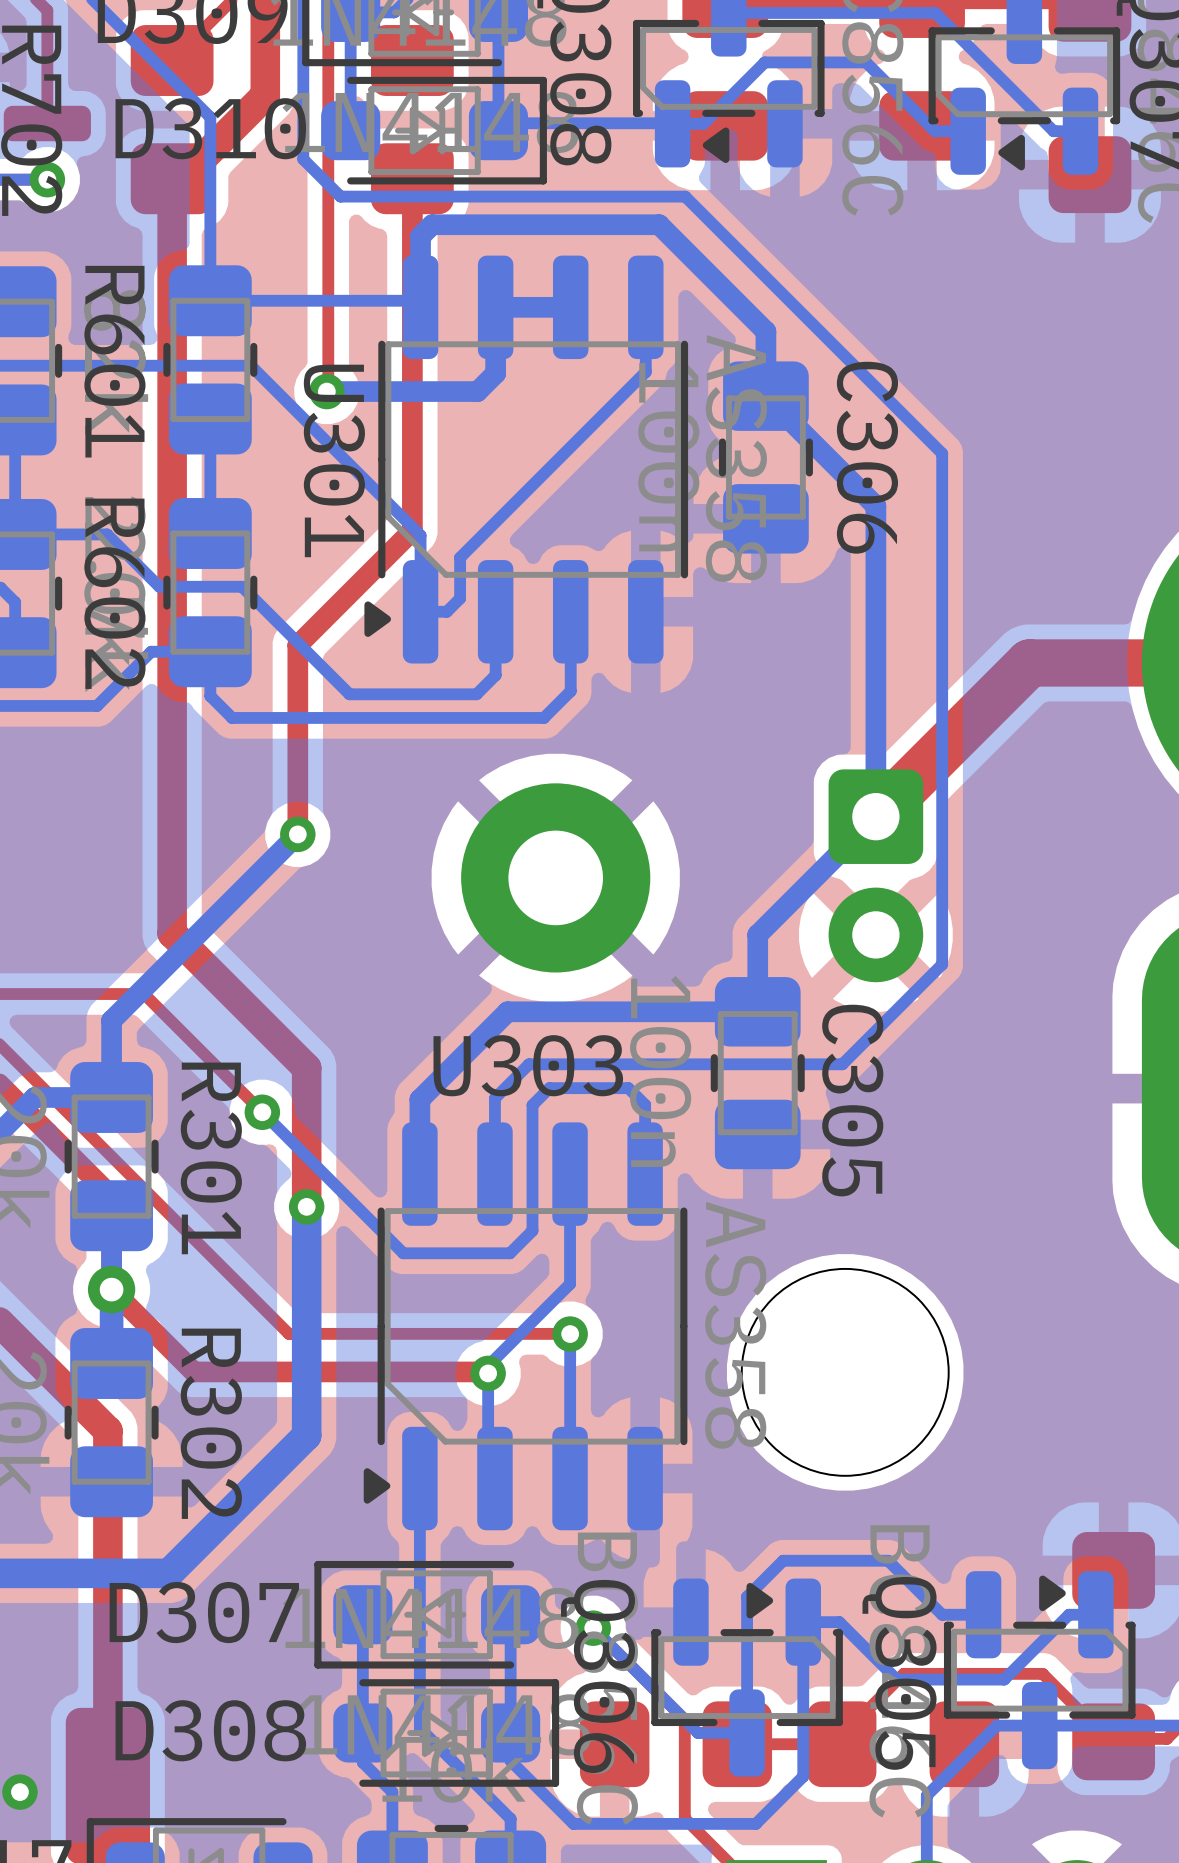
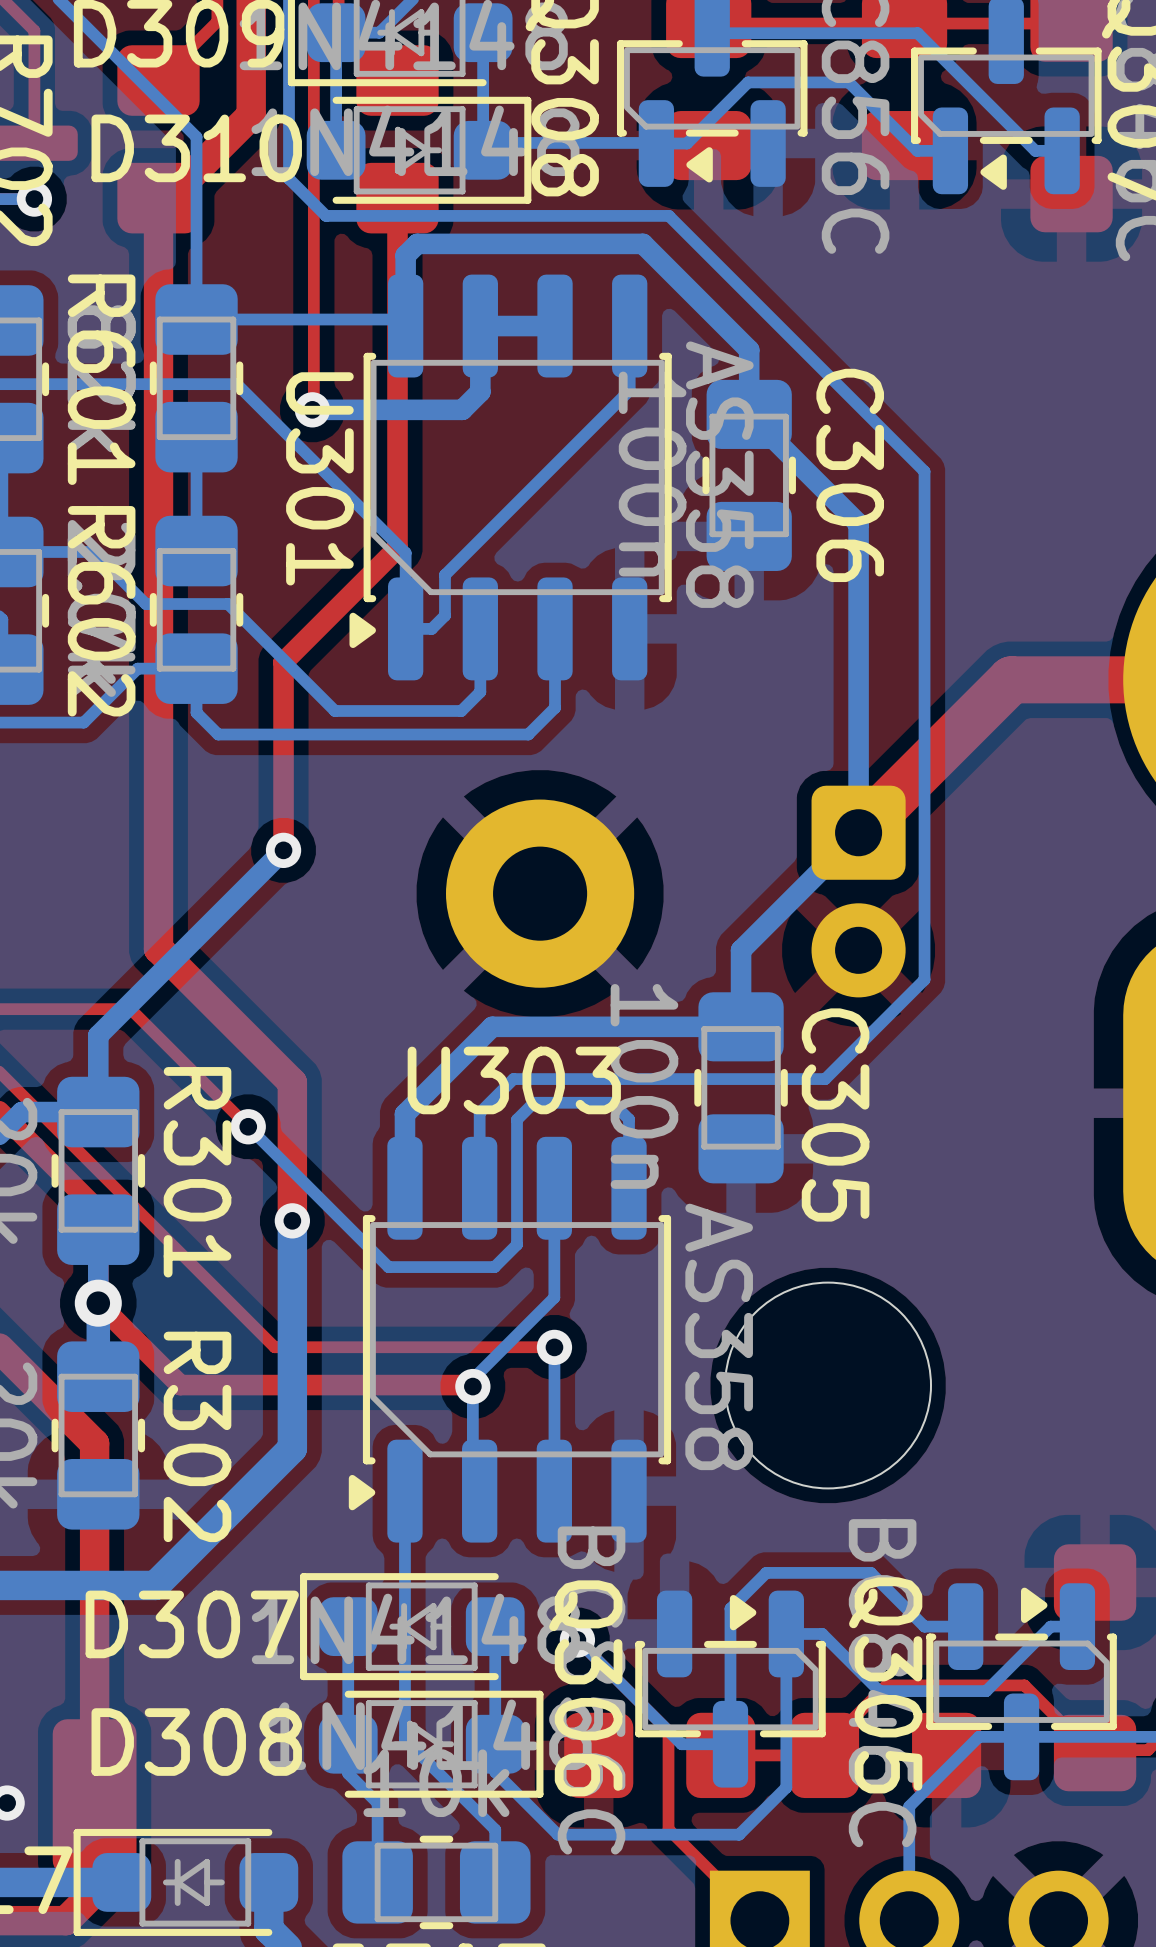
U301 footprint: [364, 255, 689, 664] -> [349, 274, 672, 681]
U303 footprint: [363, 1122, 688, 1531] -> [348, 1136, 672, 1543]

